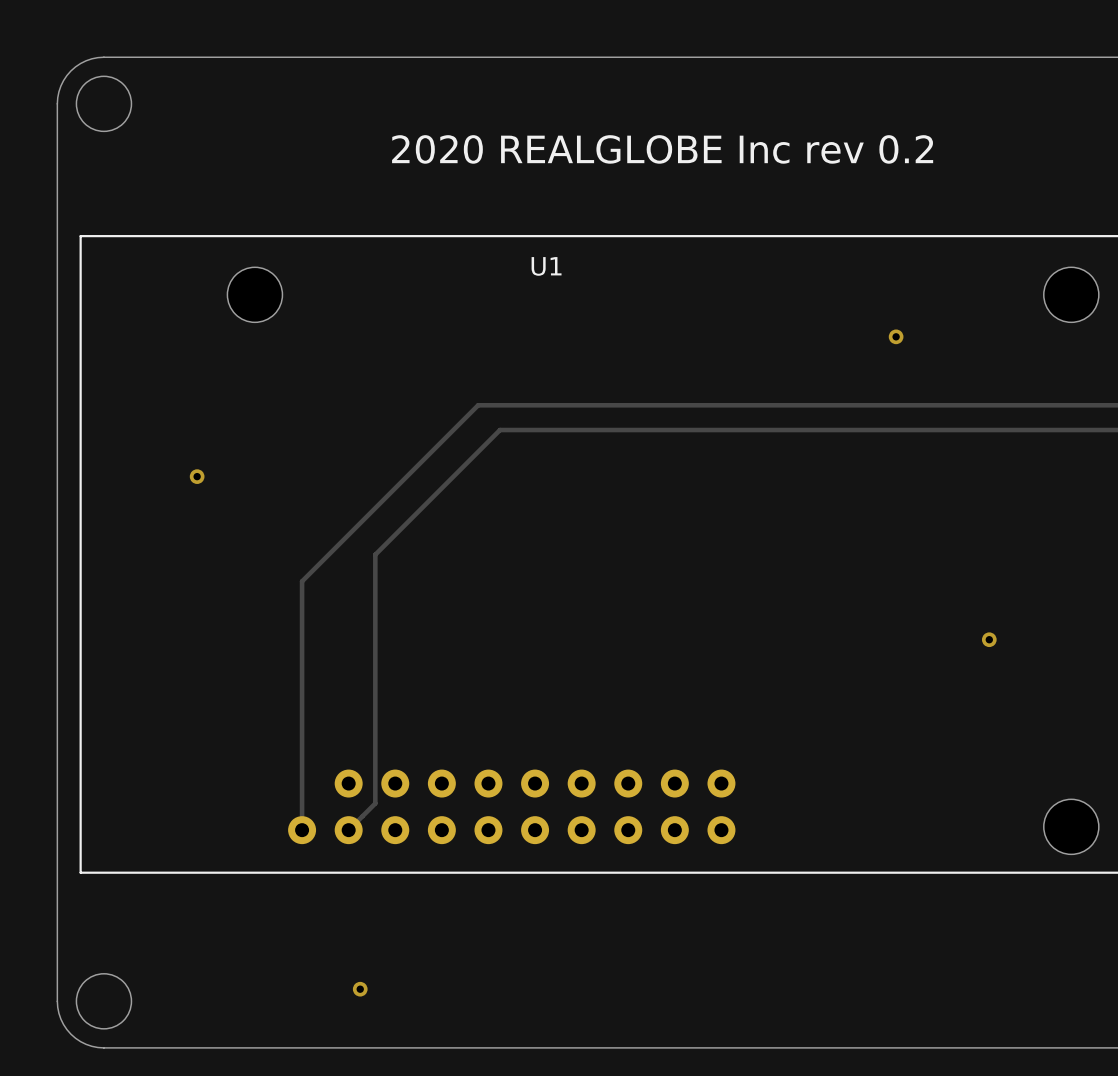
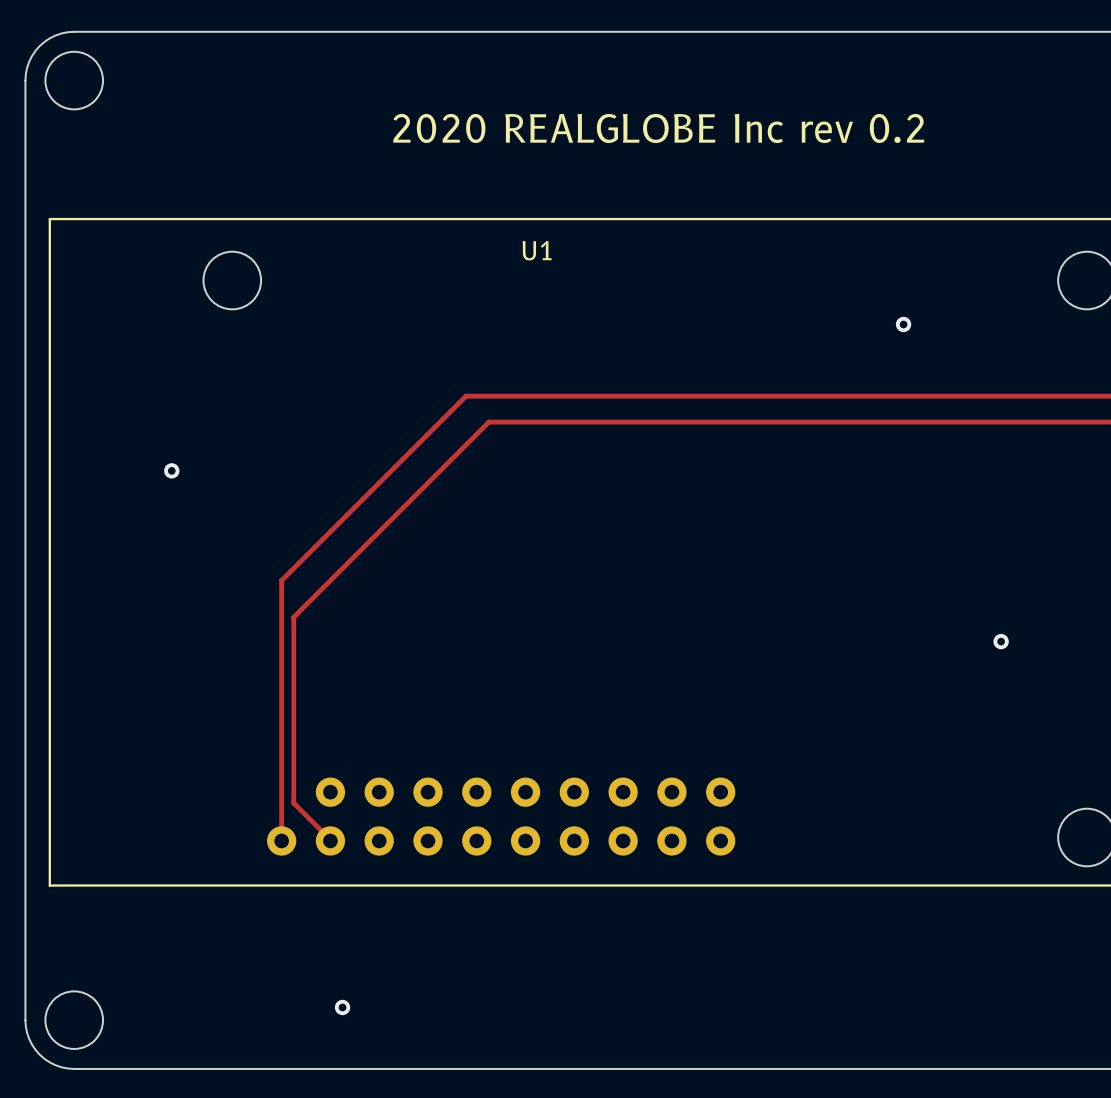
track: (375, 554) (375, 803) (348, 830) -> (358, 552) (293, 617) (293, 803) (330, 839)

